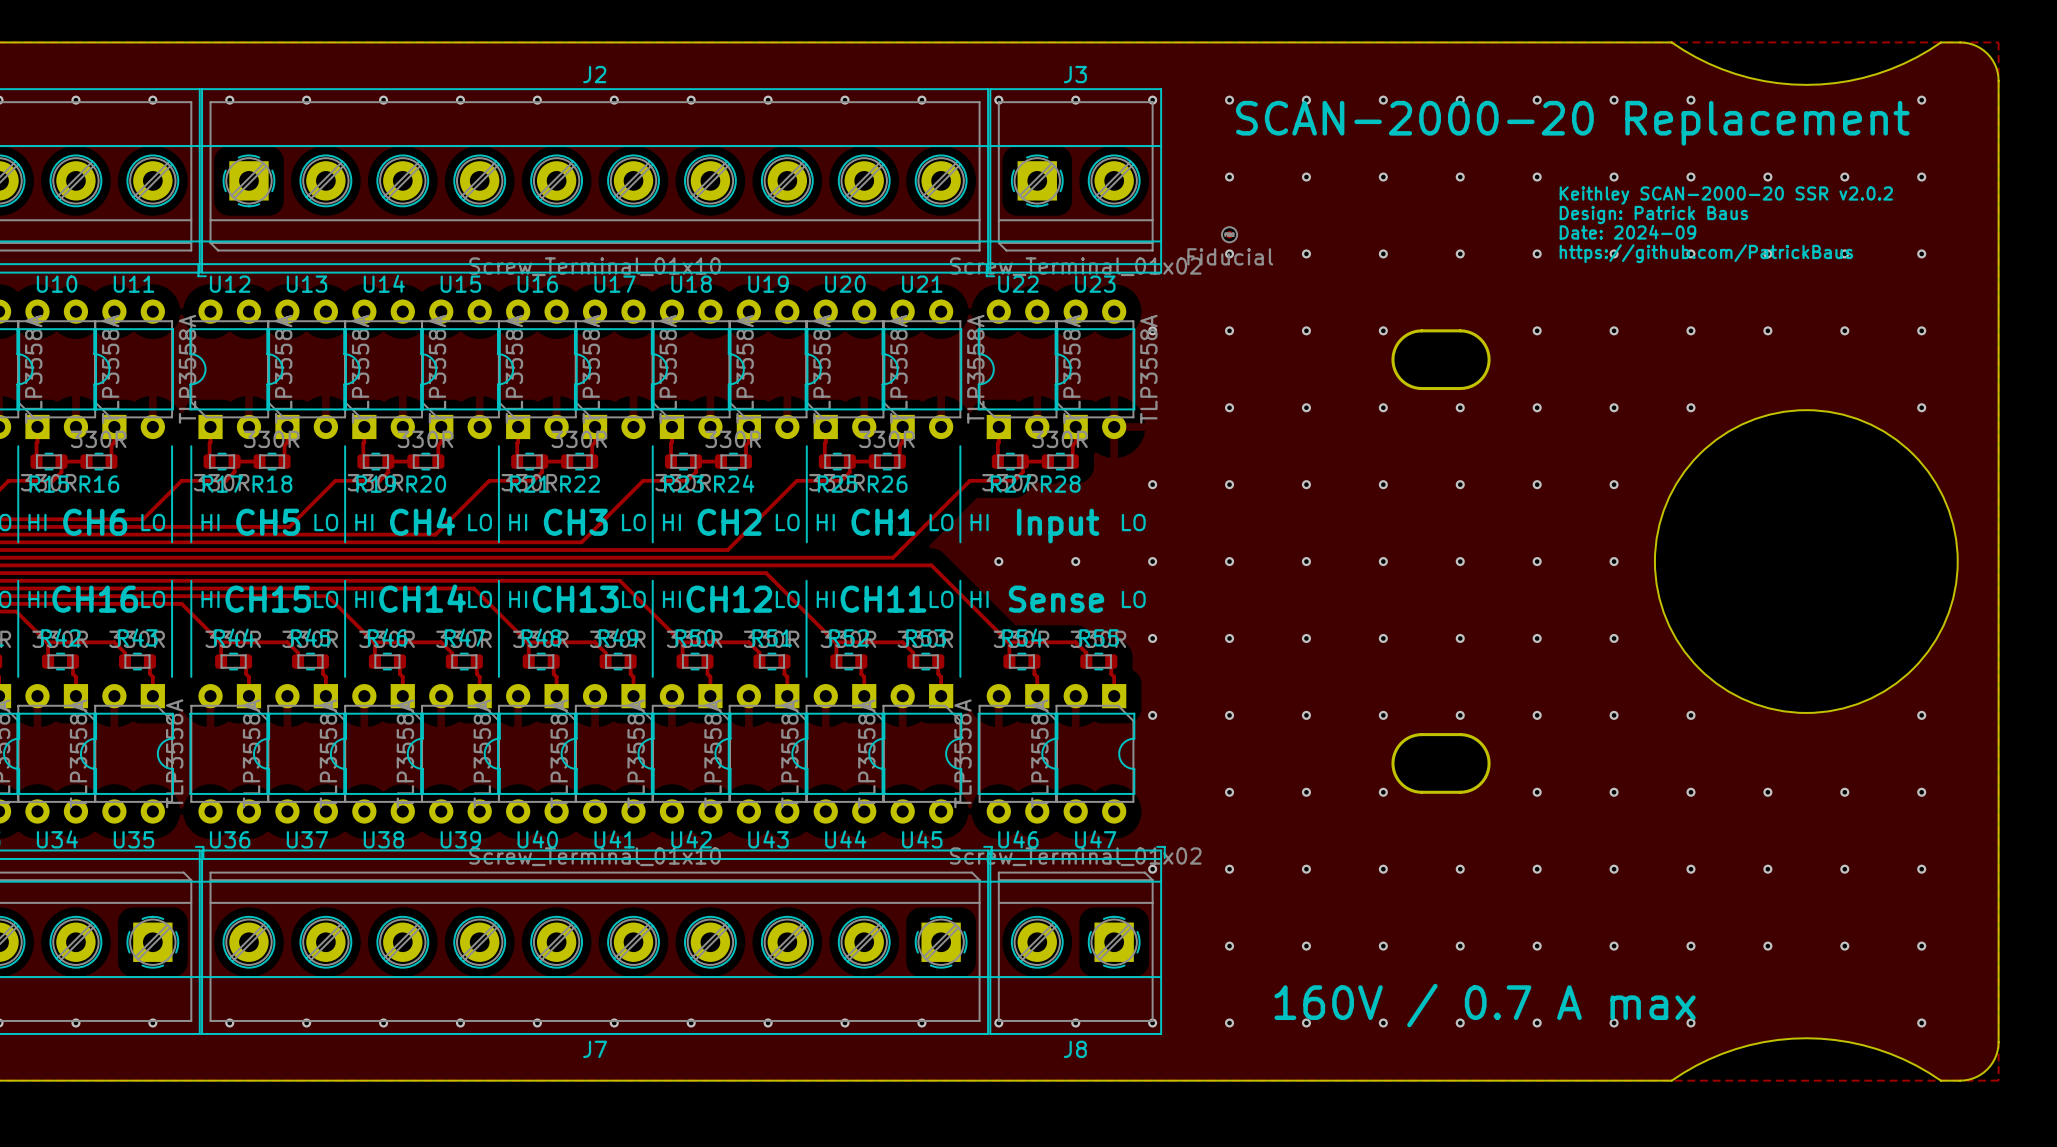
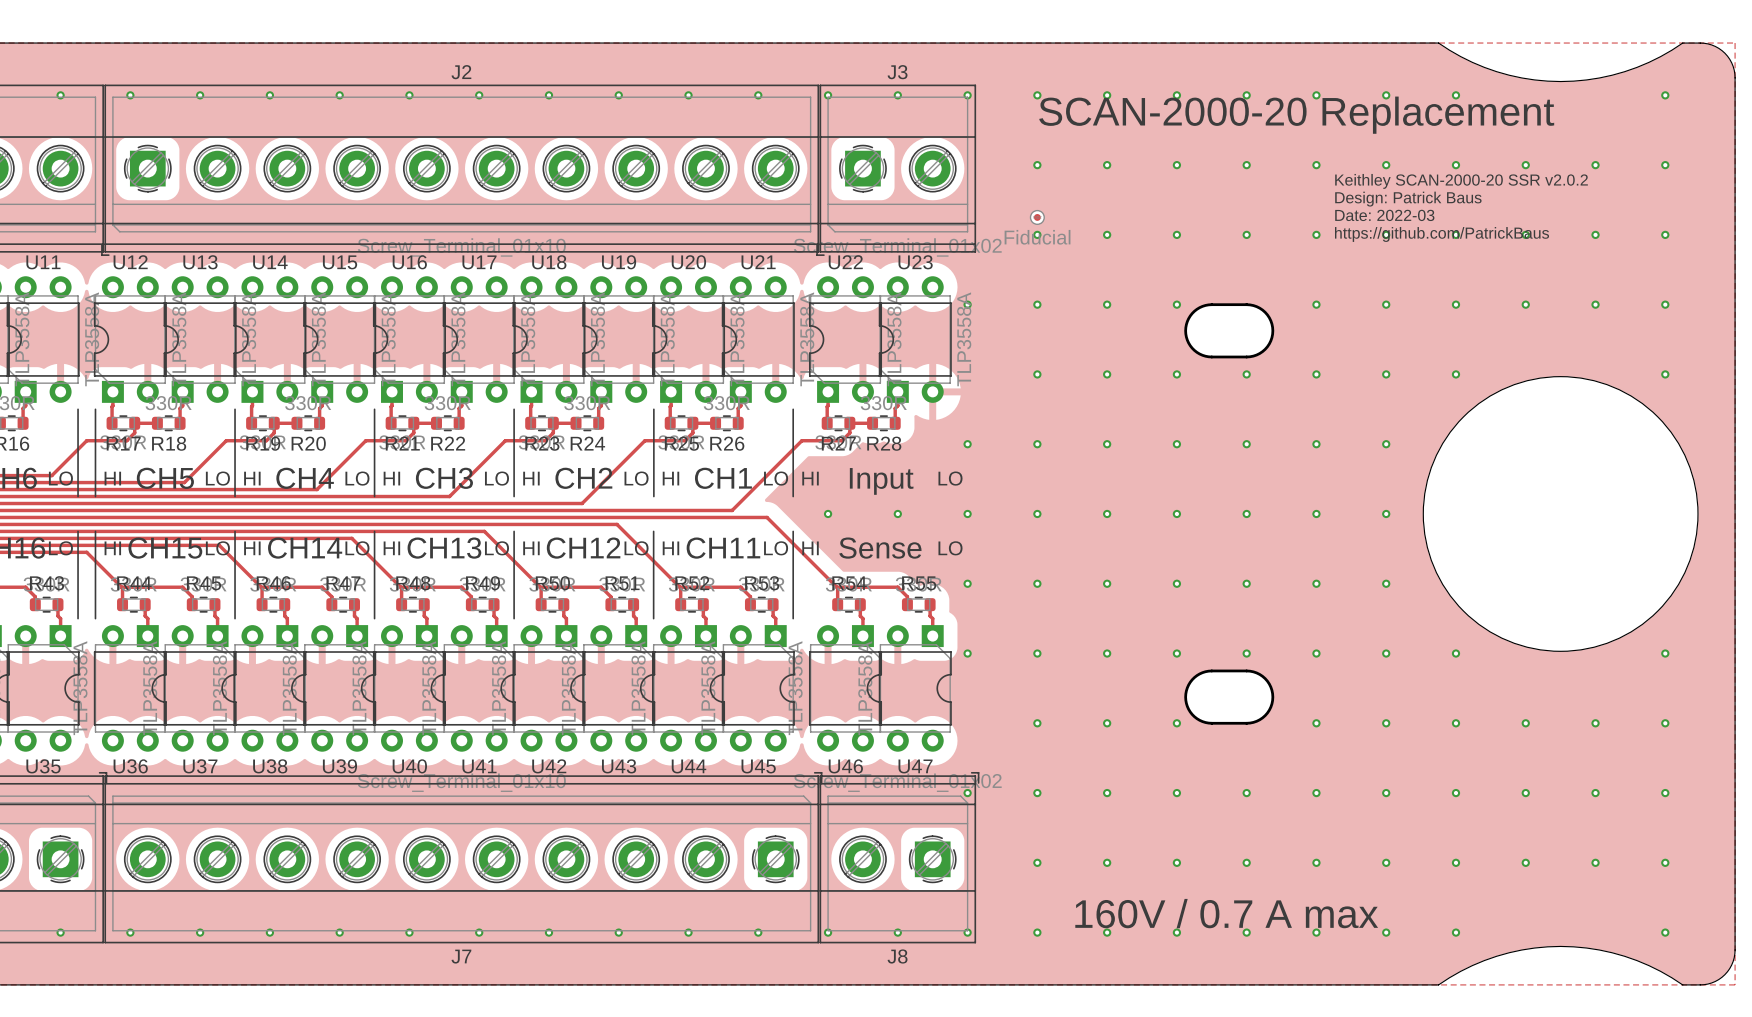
text: Date: 2024-09 (1627, 232) -> Date: 2022-03 (1384, 215)

